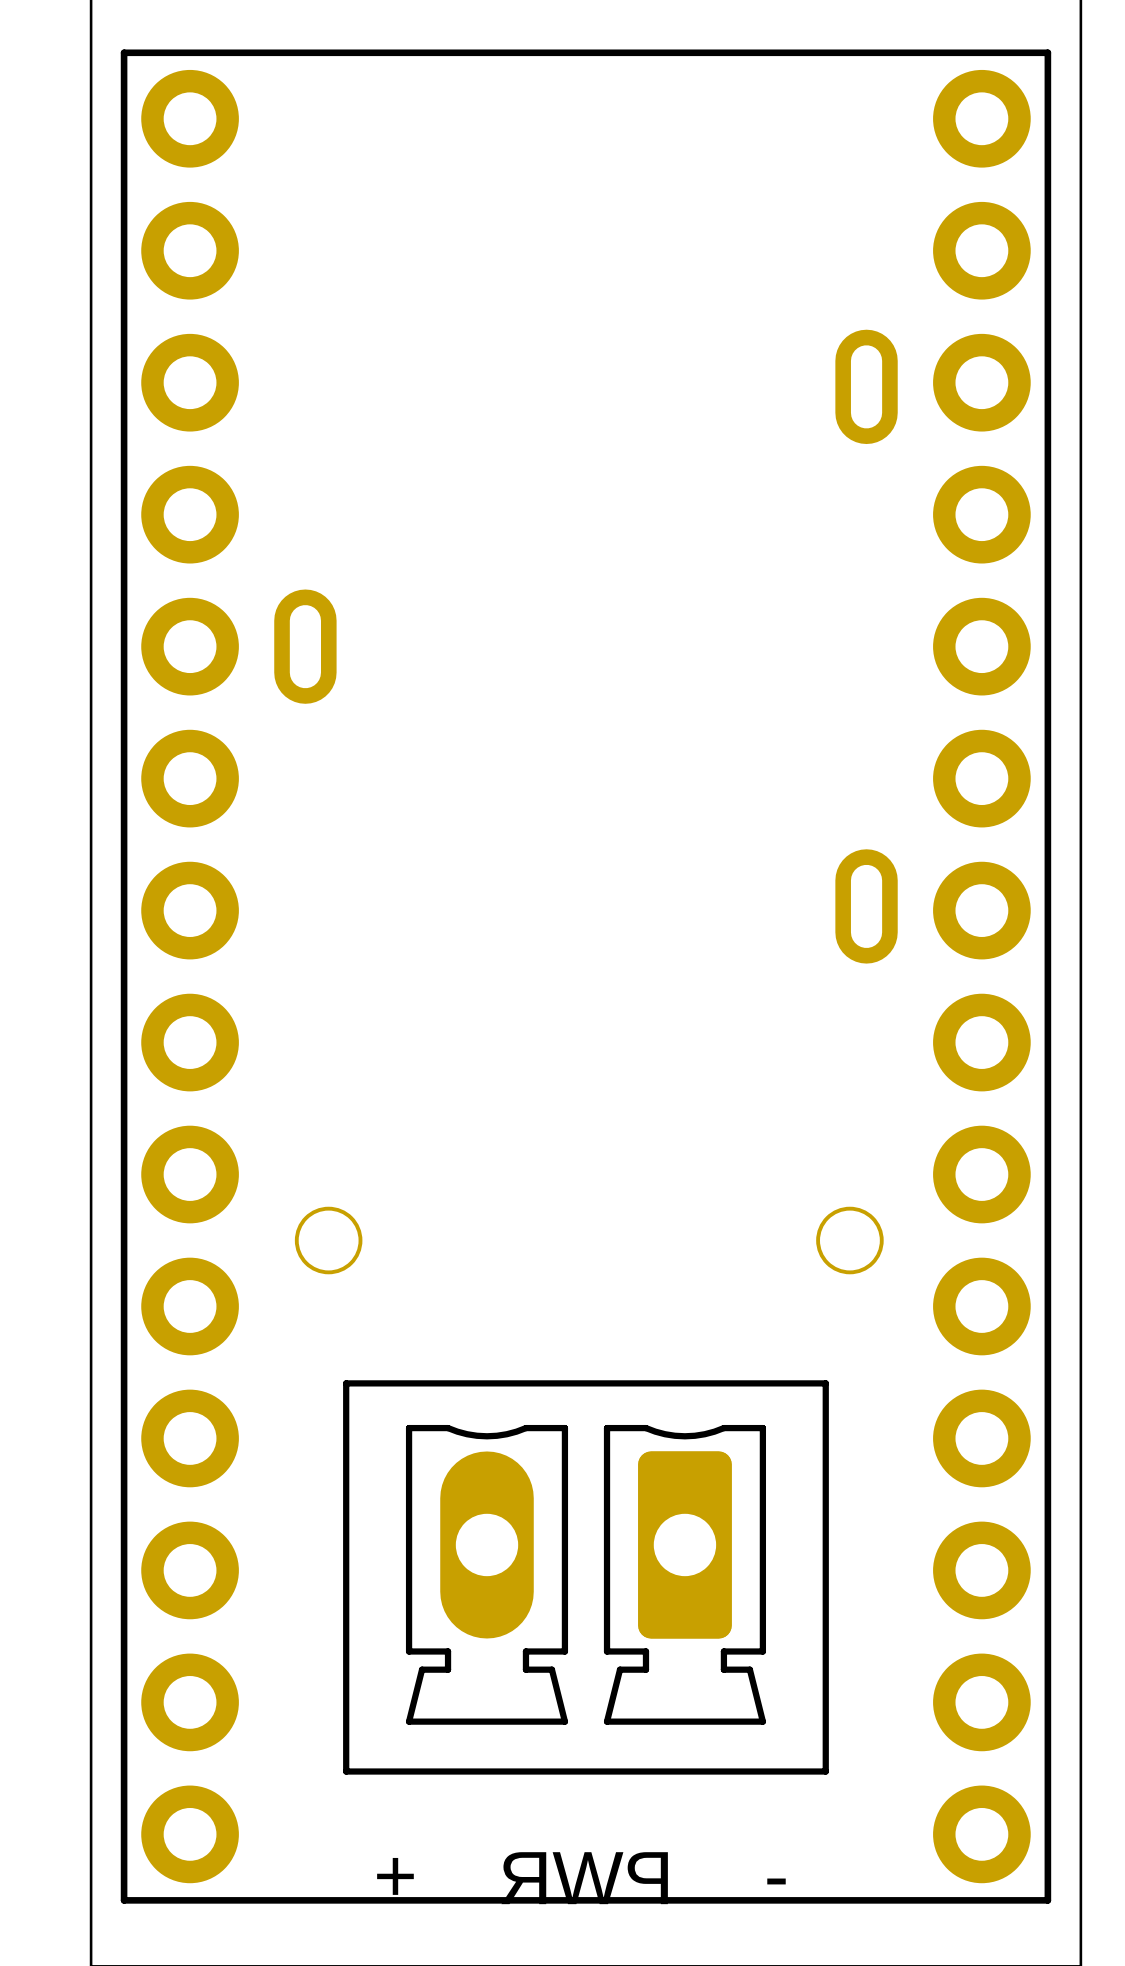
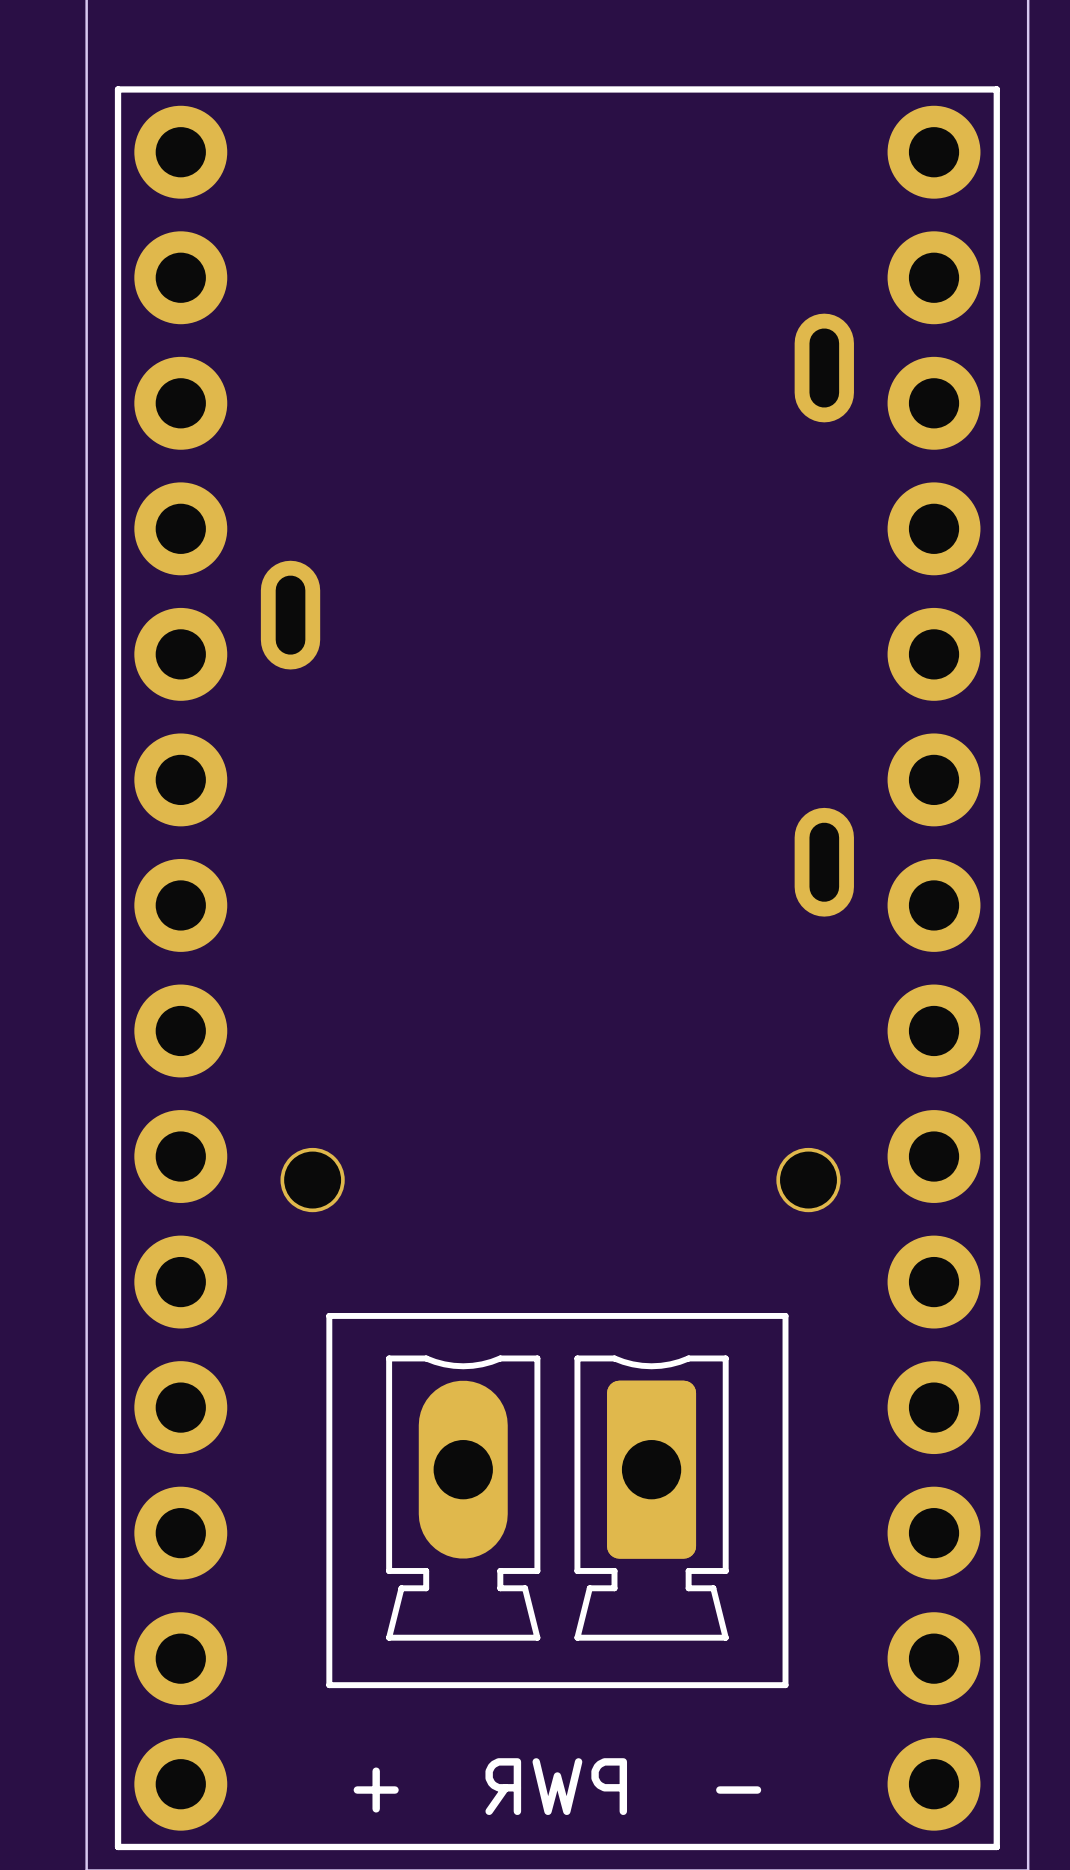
part position: (585, 976) -> (557, 968)

